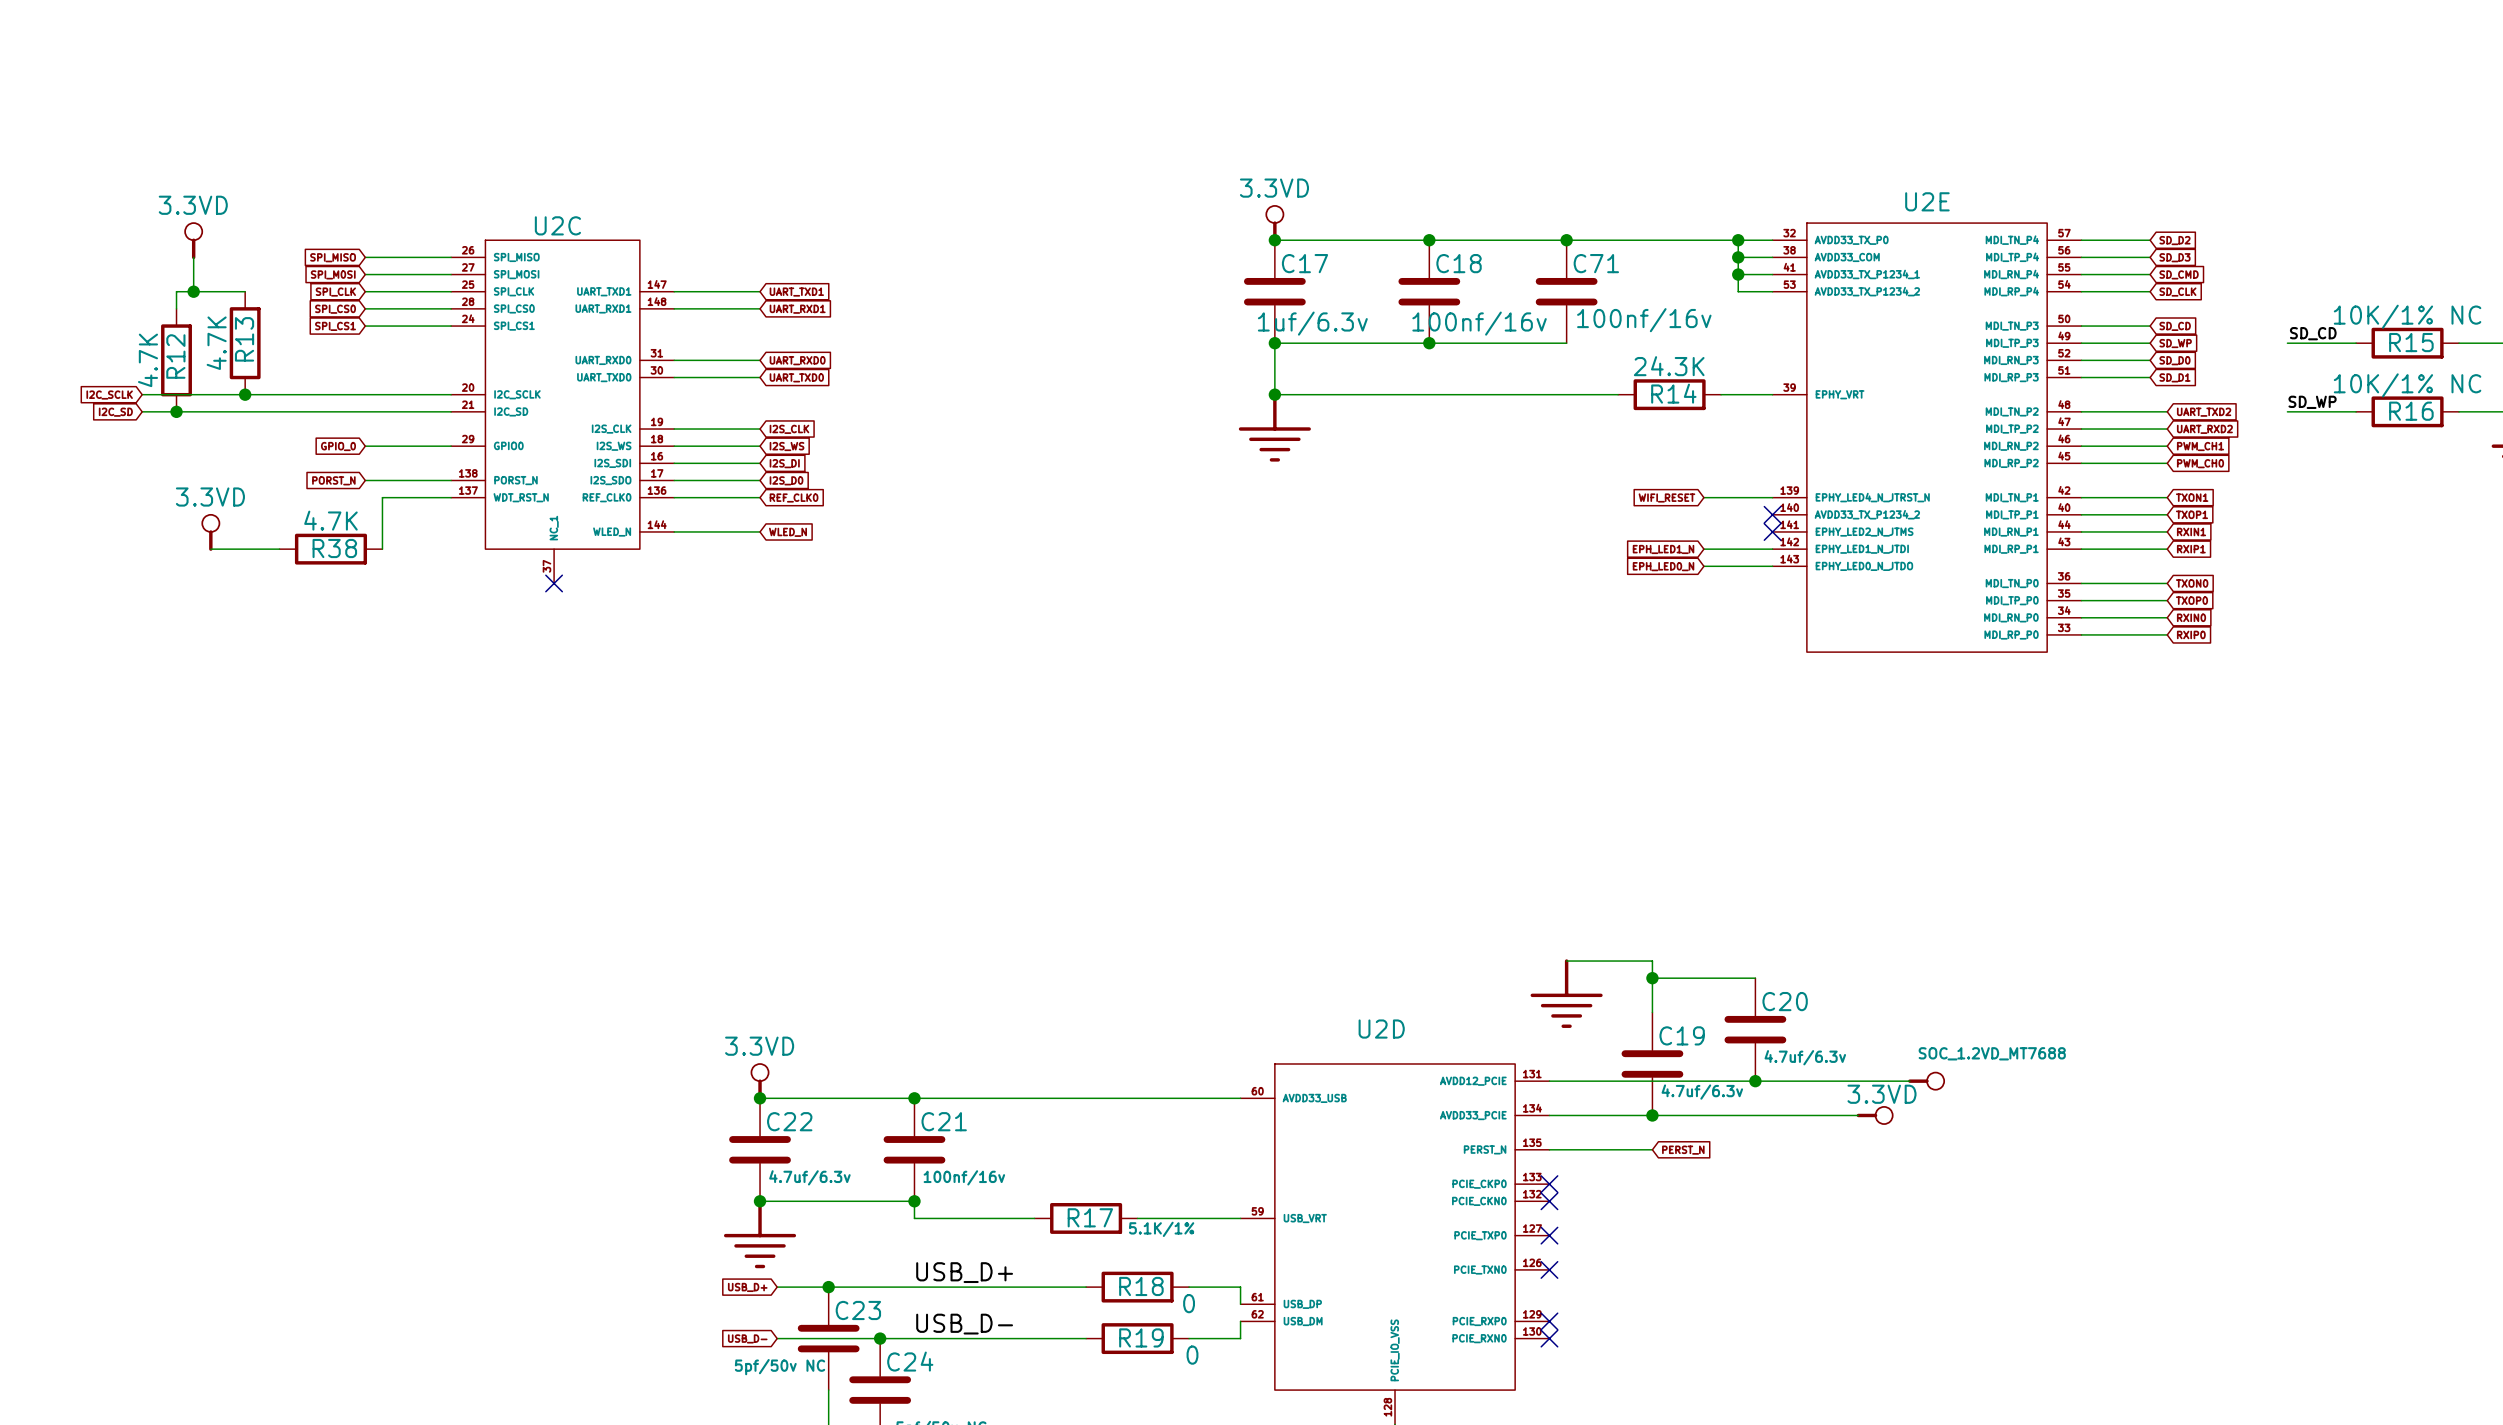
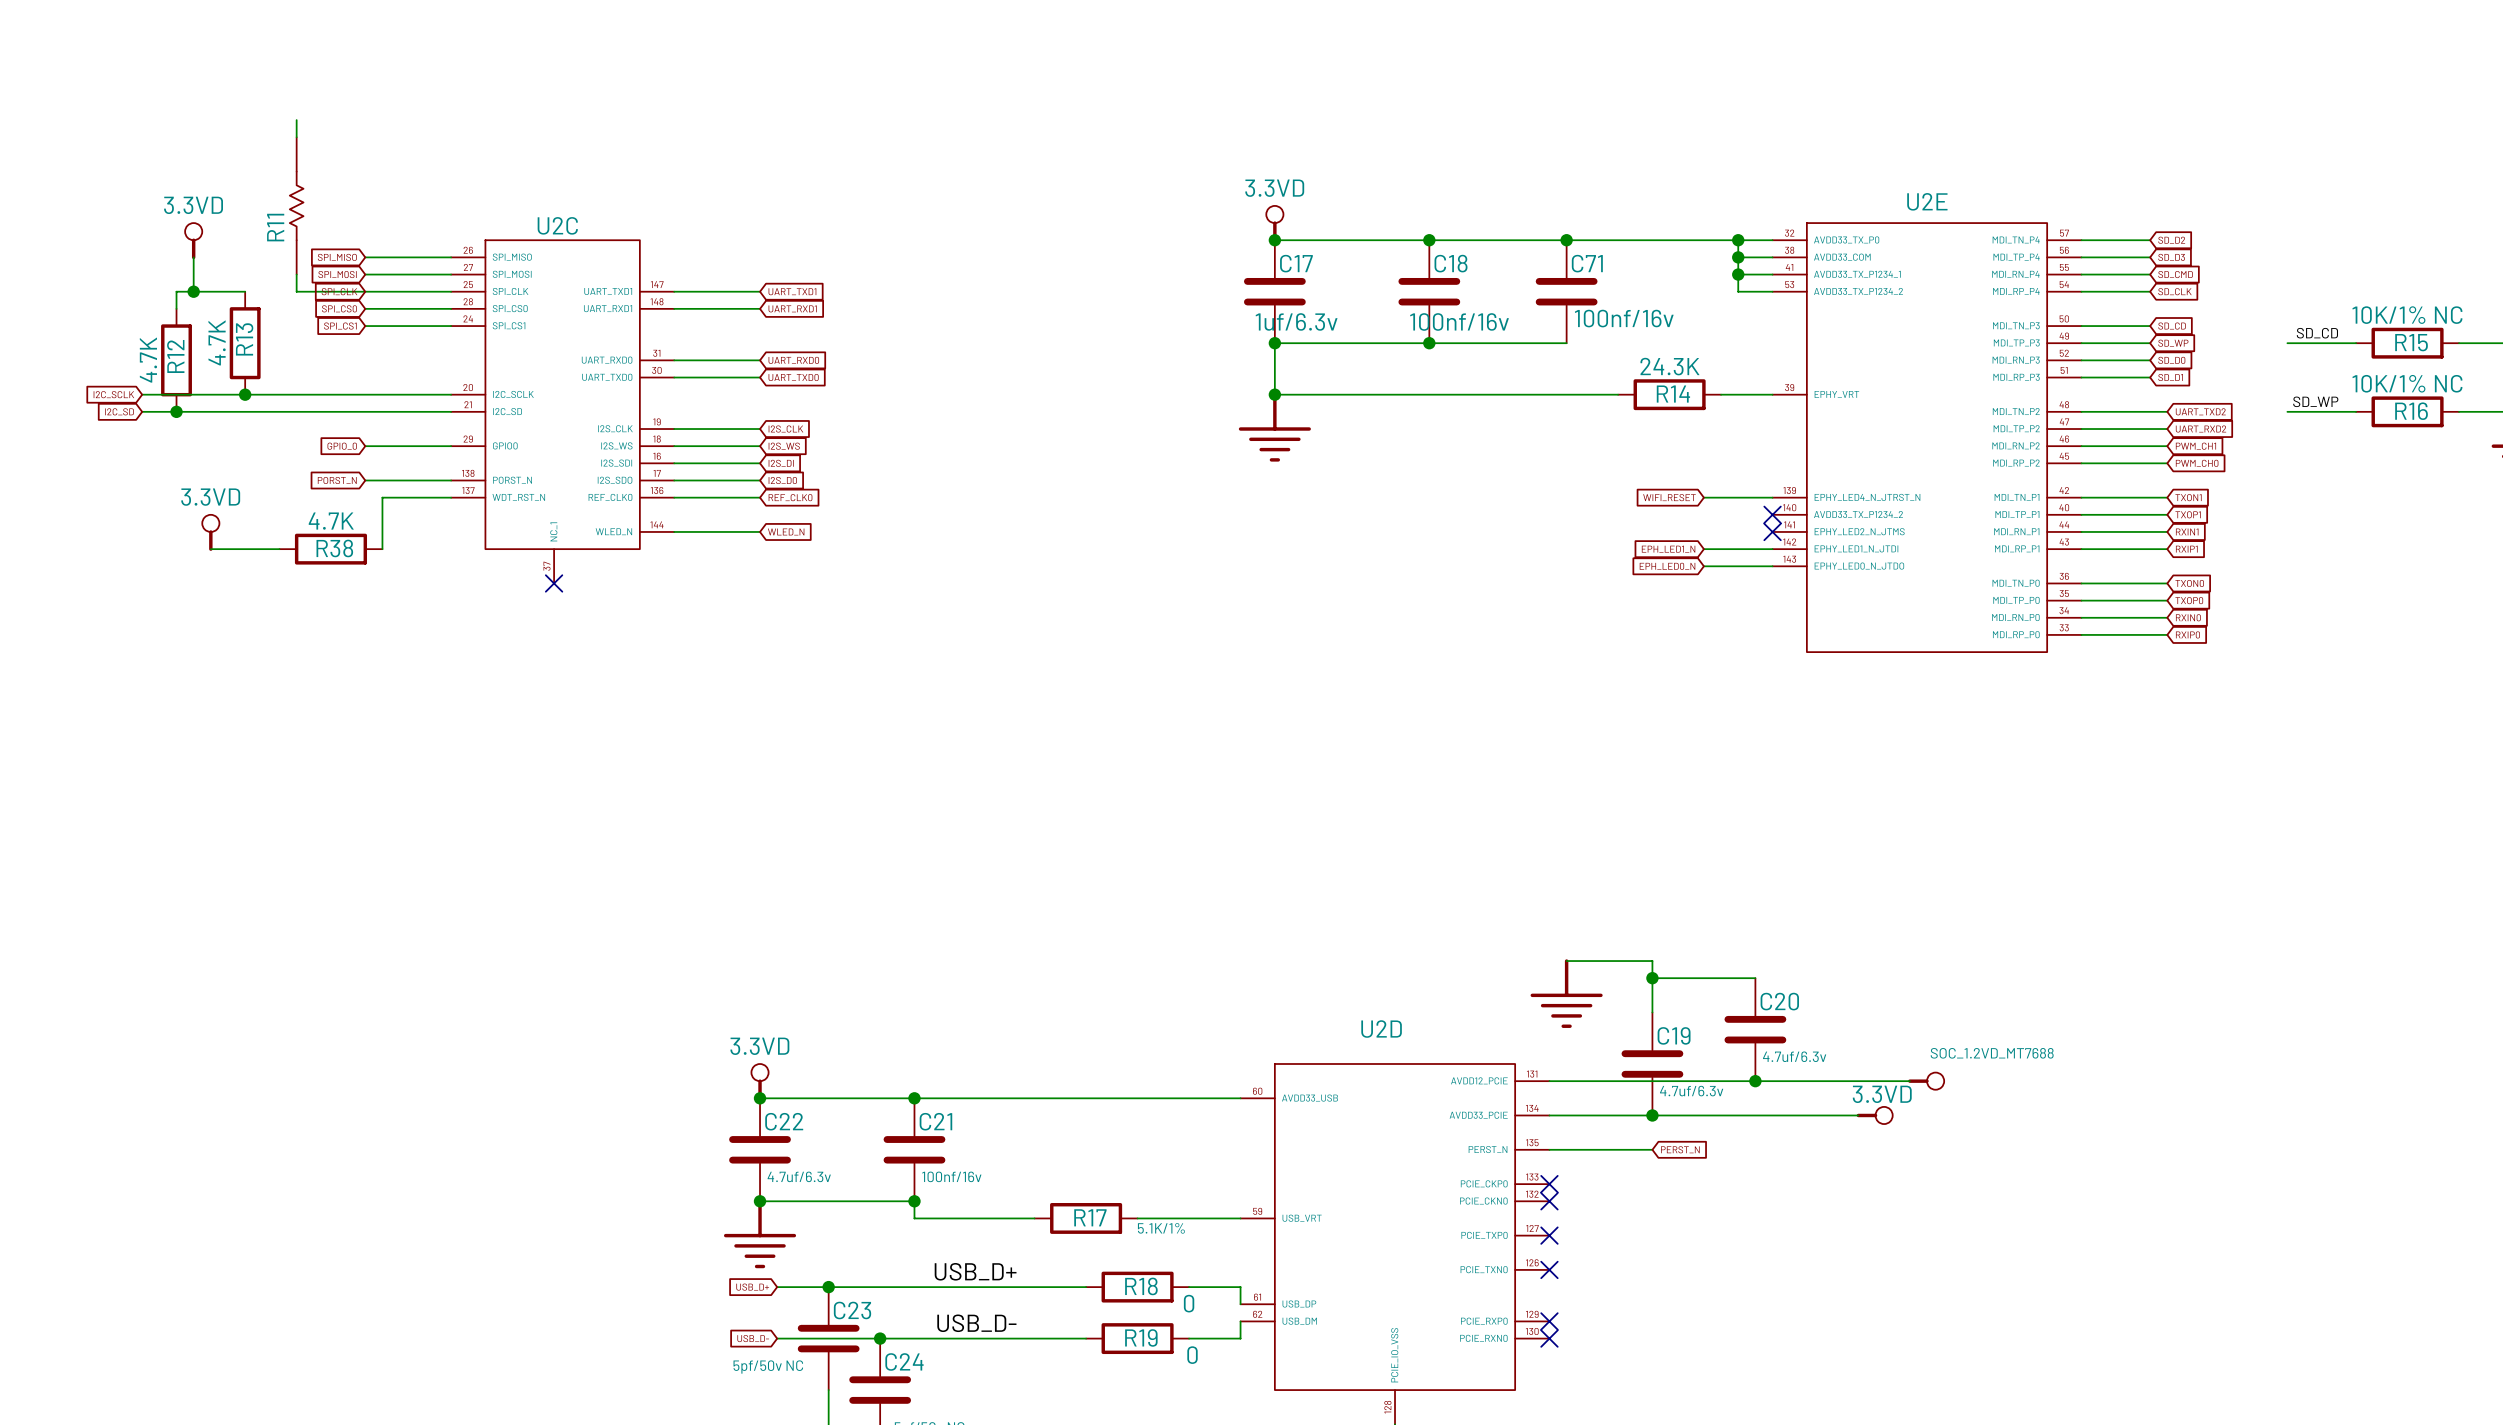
wire: none -> (296, 120) (296, 137)
R11: none -> (296, 205)
wire: none -> (296, 274) (296, 291) (365, 291)

